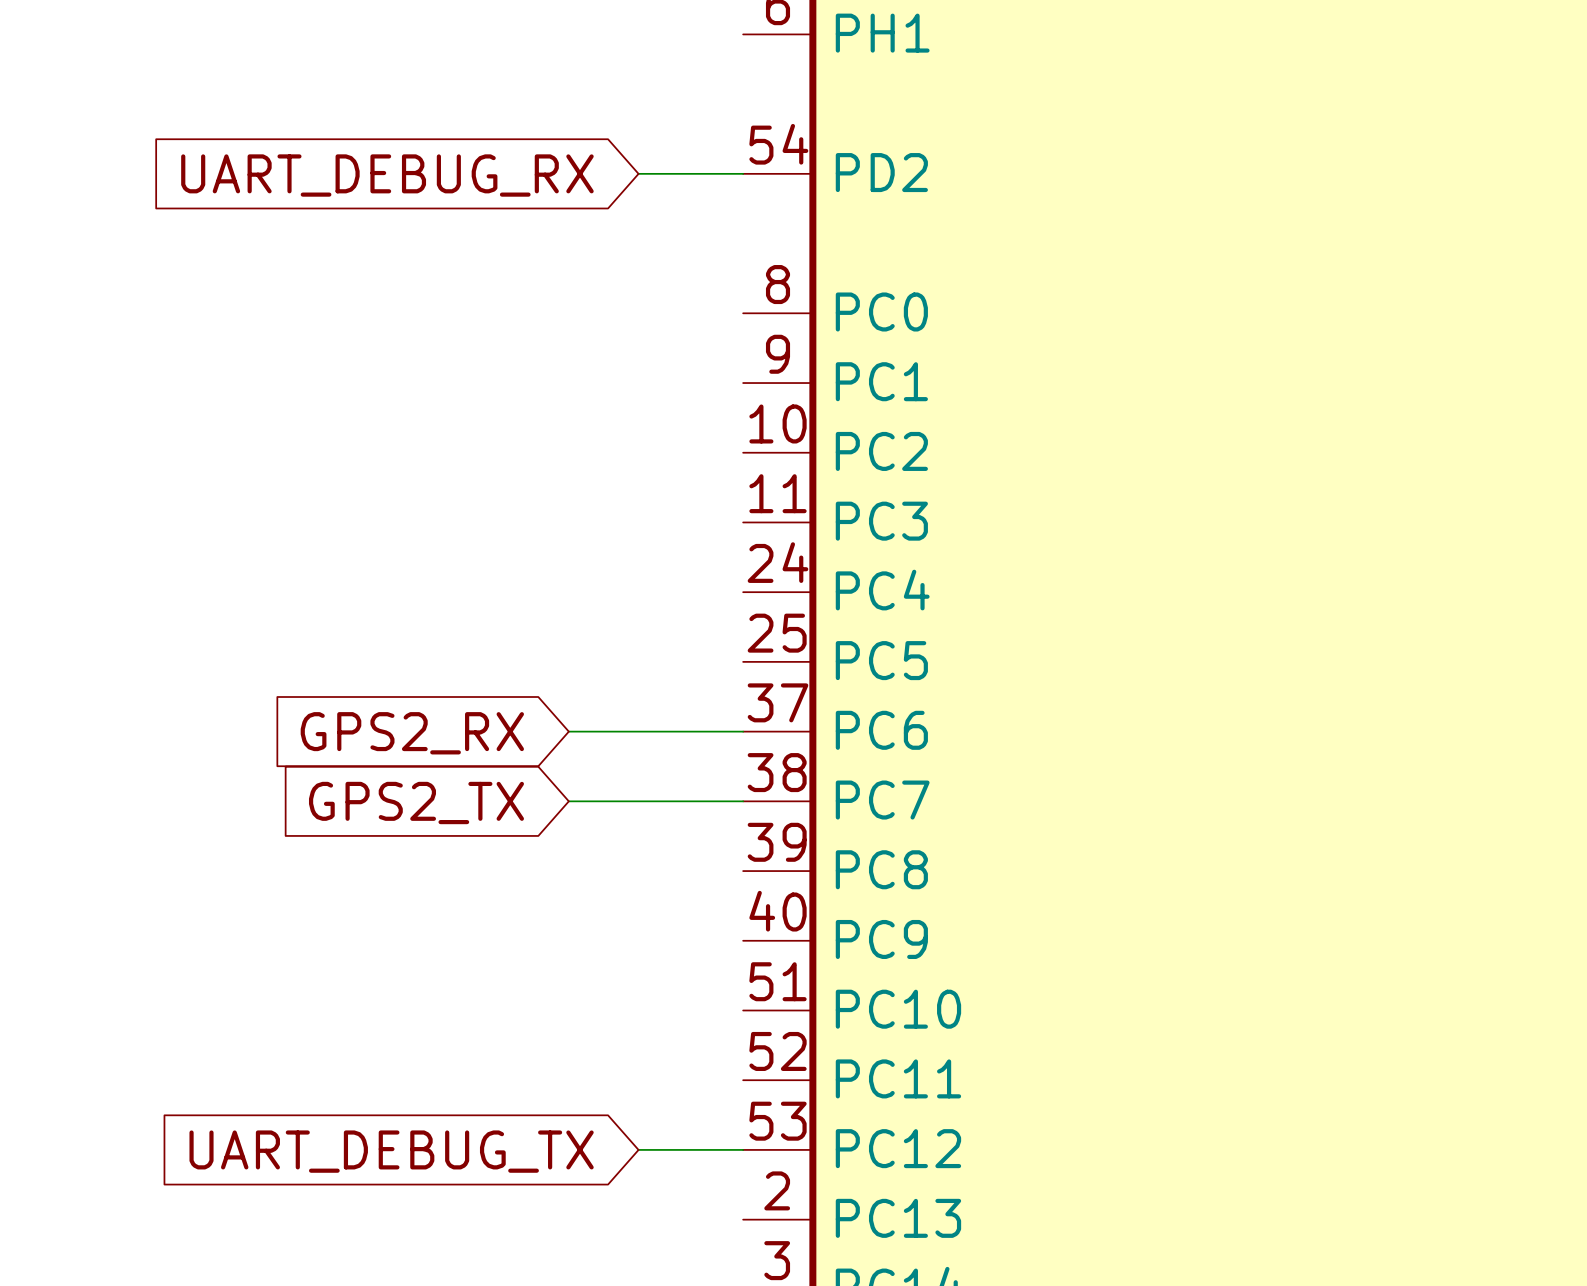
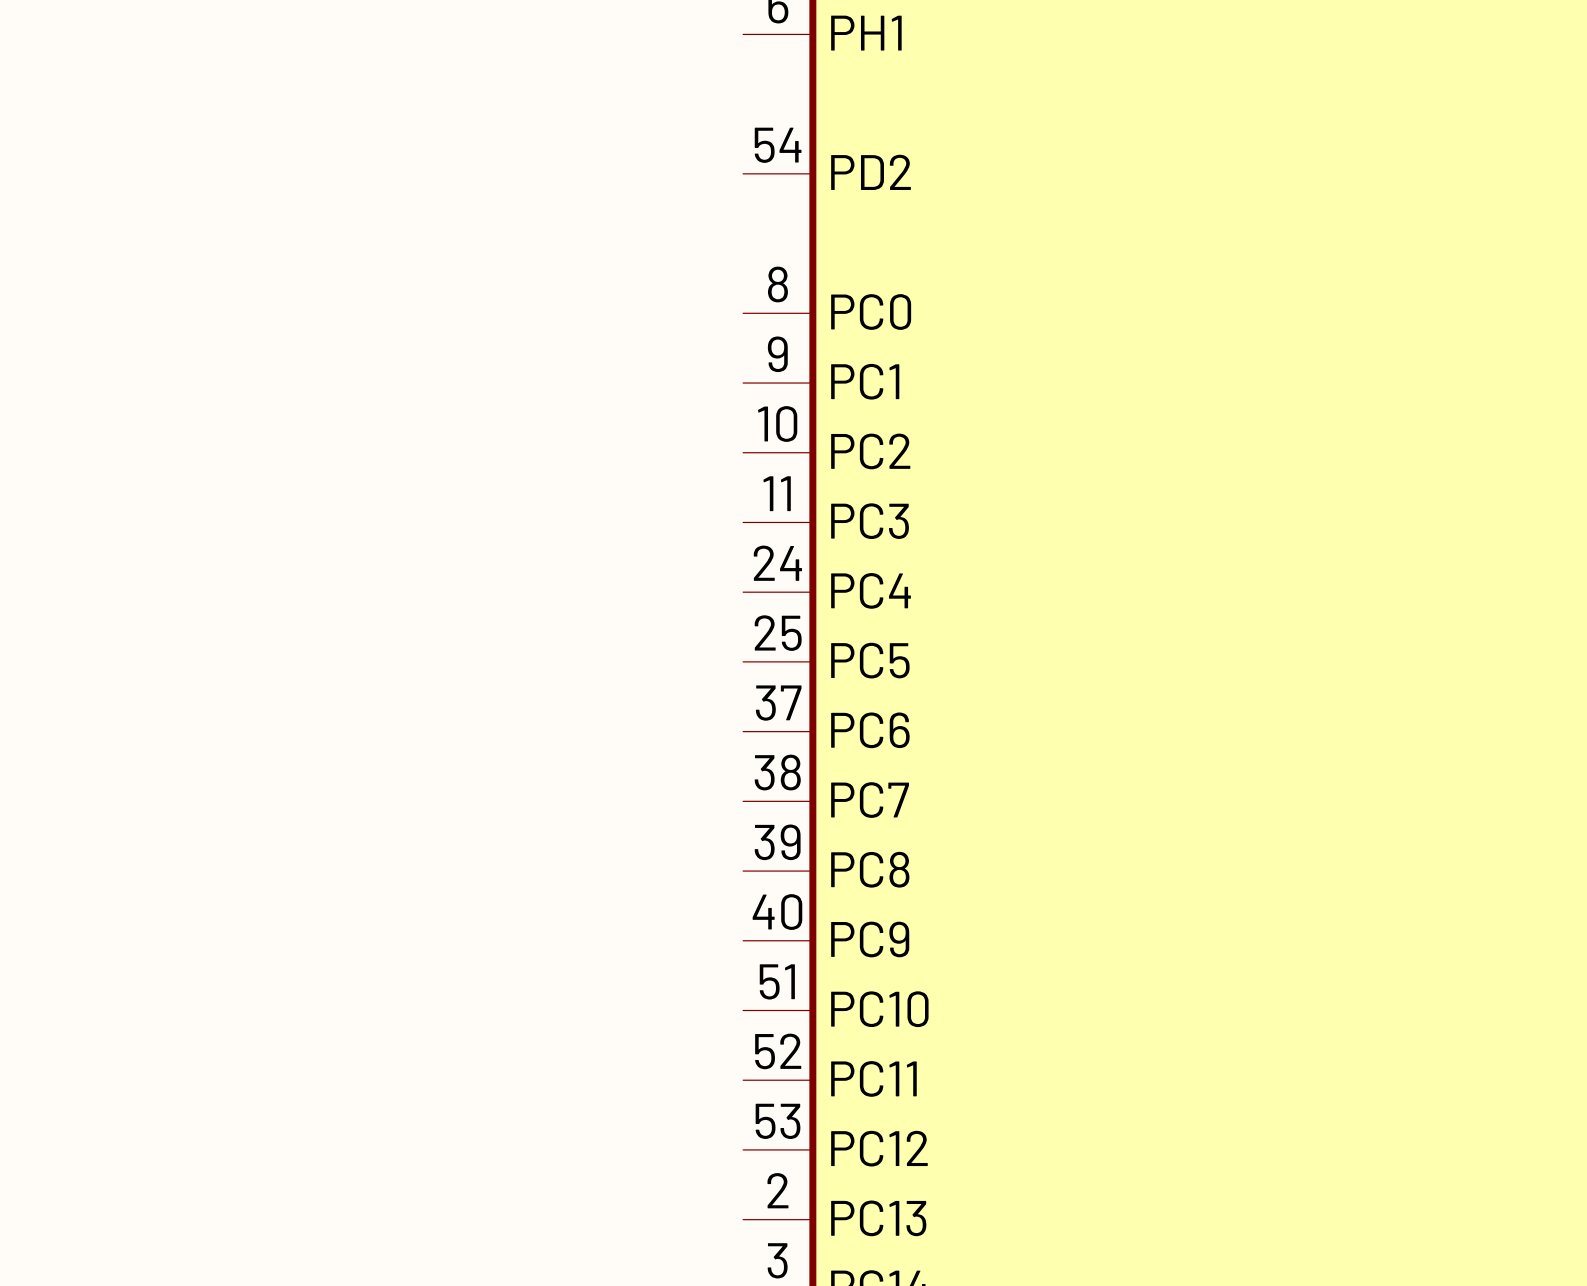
wire: (638, 173) (743, 173) -> none
global label: UART_DEBUG_RX (387, 175) -> none
wire: (568, 731) (743, 731) -> none
global label: GPS2_RX (412, 733) -> none
wire: (568, 801) (743, 801) -> none
global label: GPS2_TX (416, 803) -> none
wire: (638, 1149) (743, 1149) -> none
global label: UART_DEBUG_TX (391, 1151) -> none

